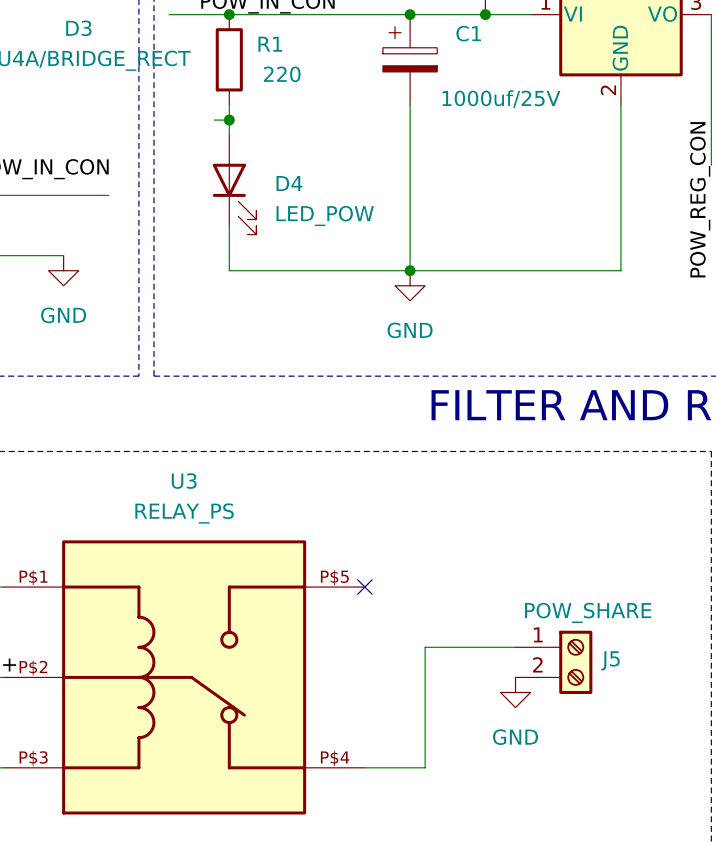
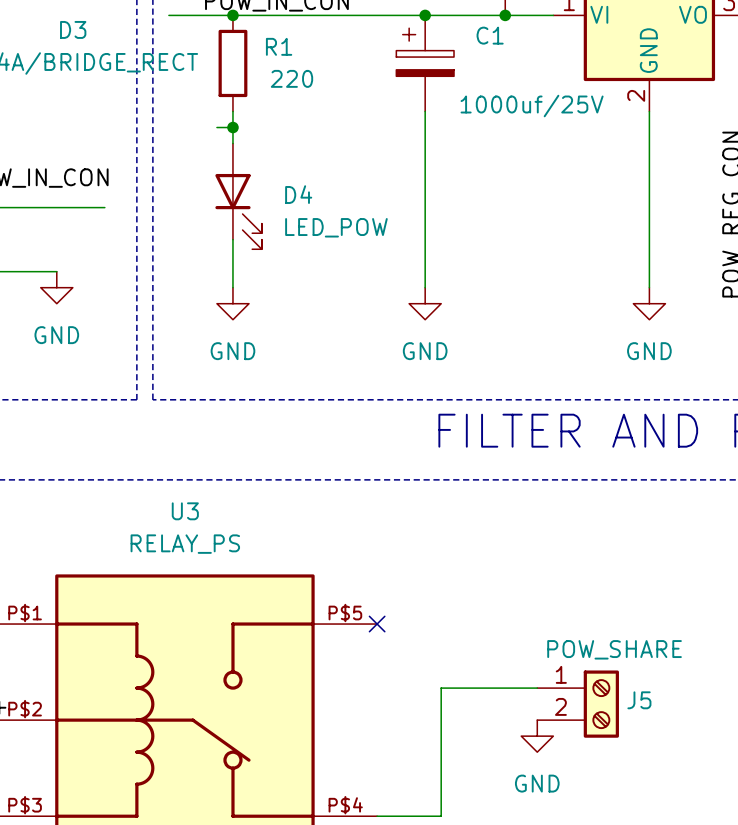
wire: (229, 270) (620, 270) -> none
junction: (410, 270) -> none
power symbol: none -> GND (232, 303)
power symbol: none -> GND (649, 303)

